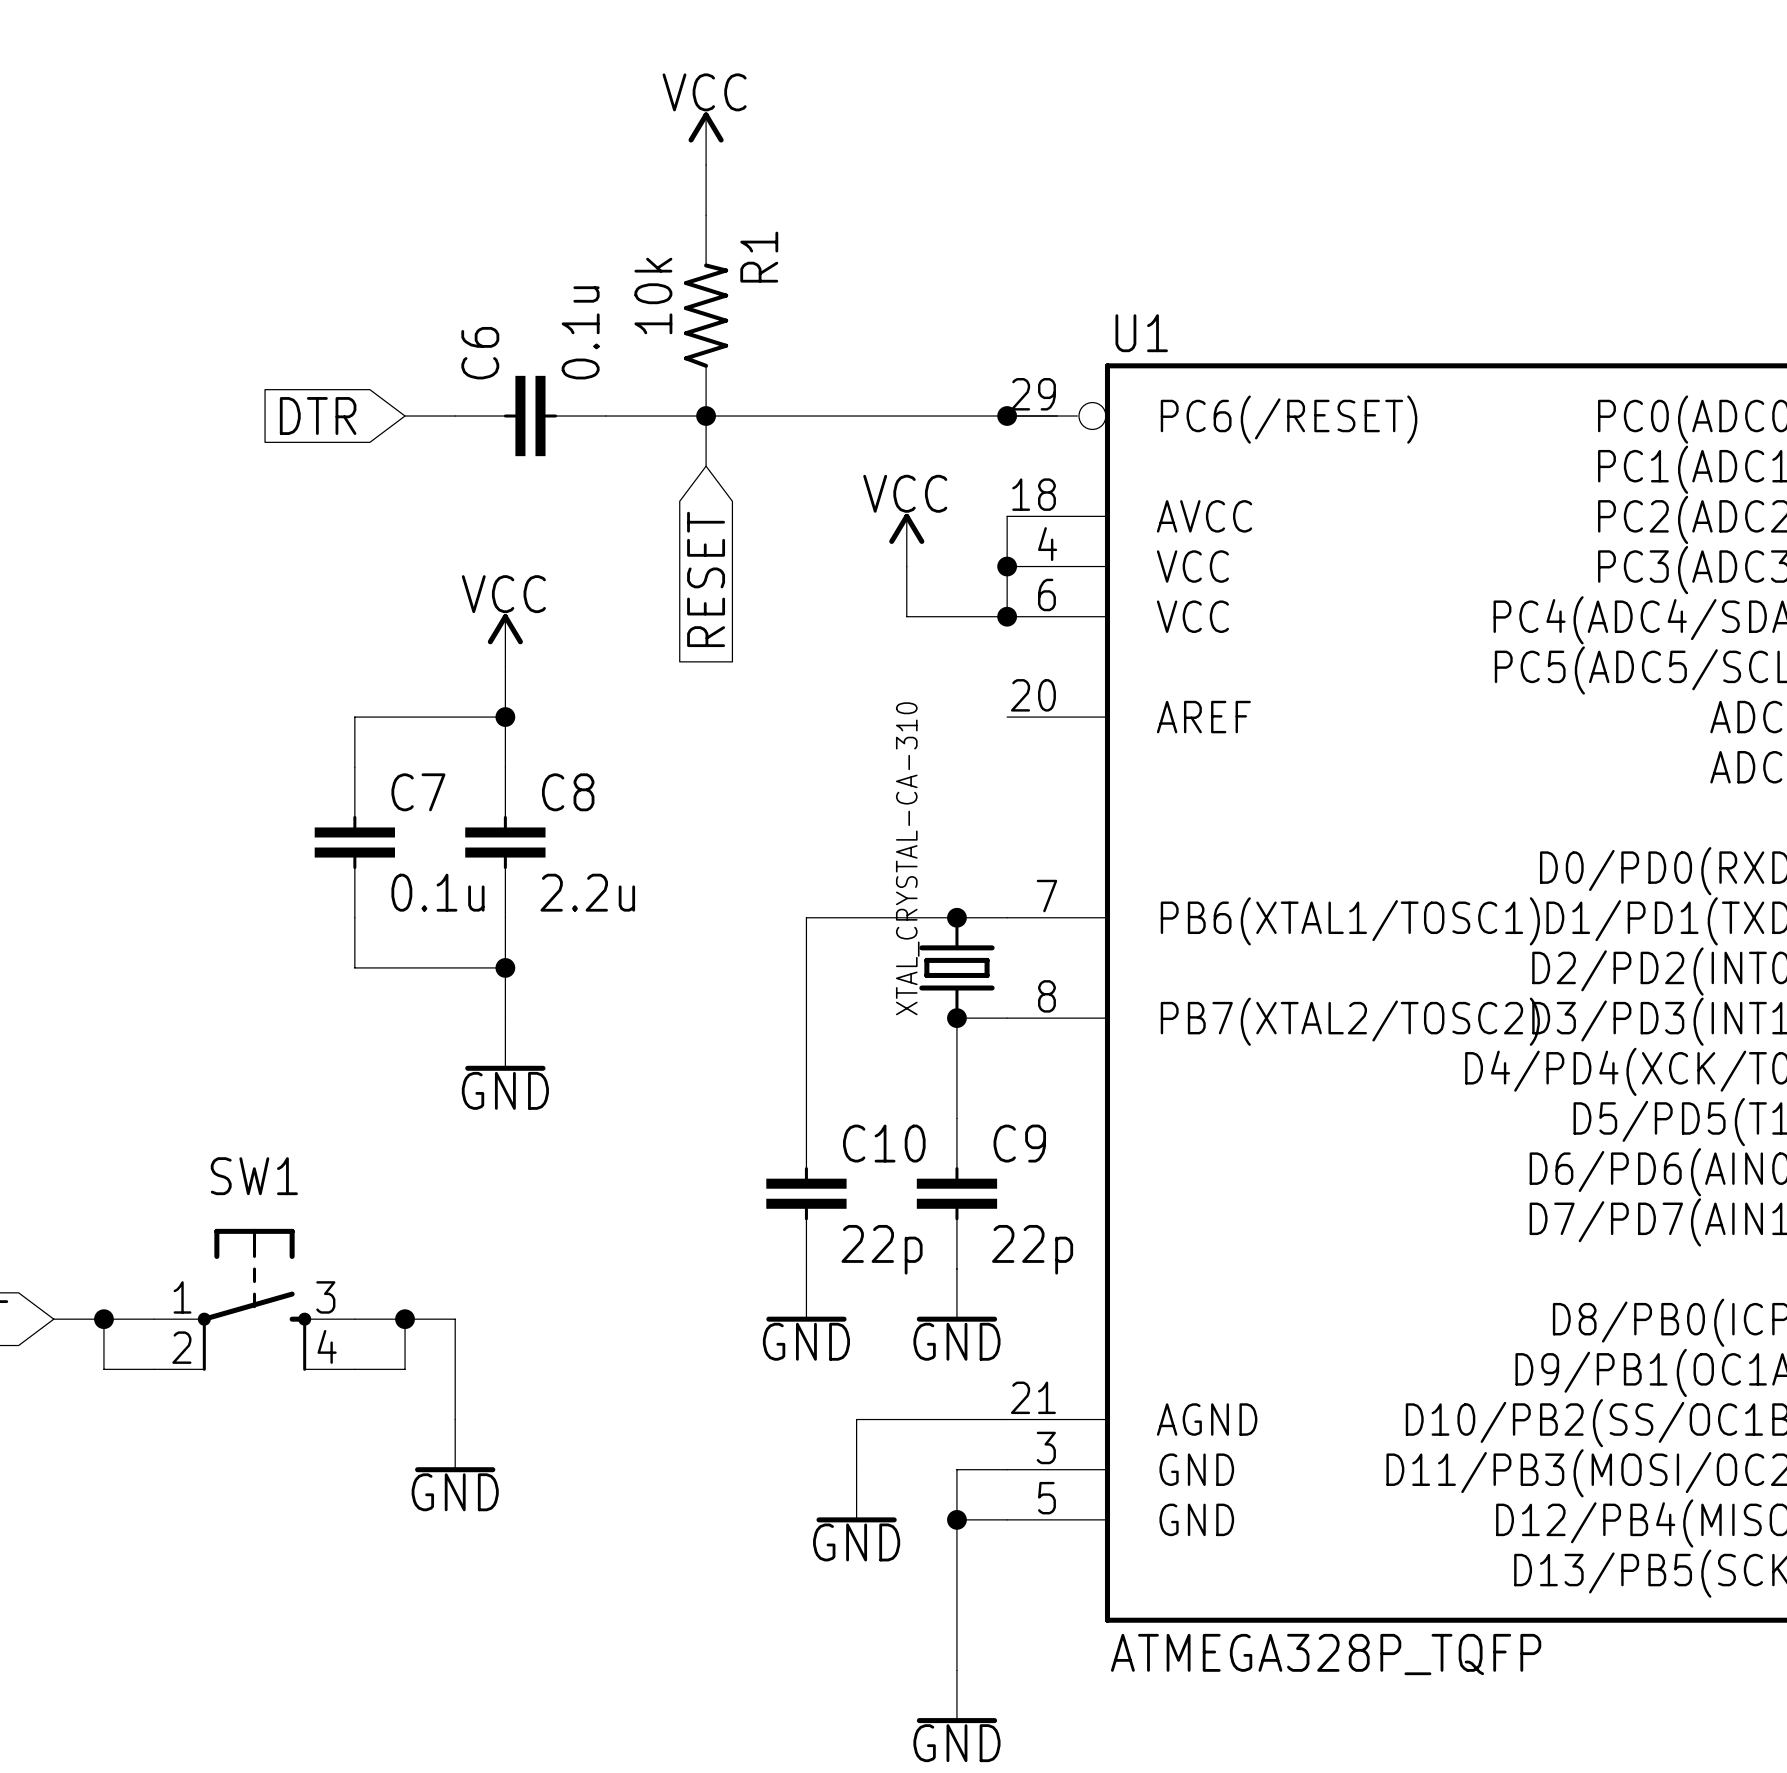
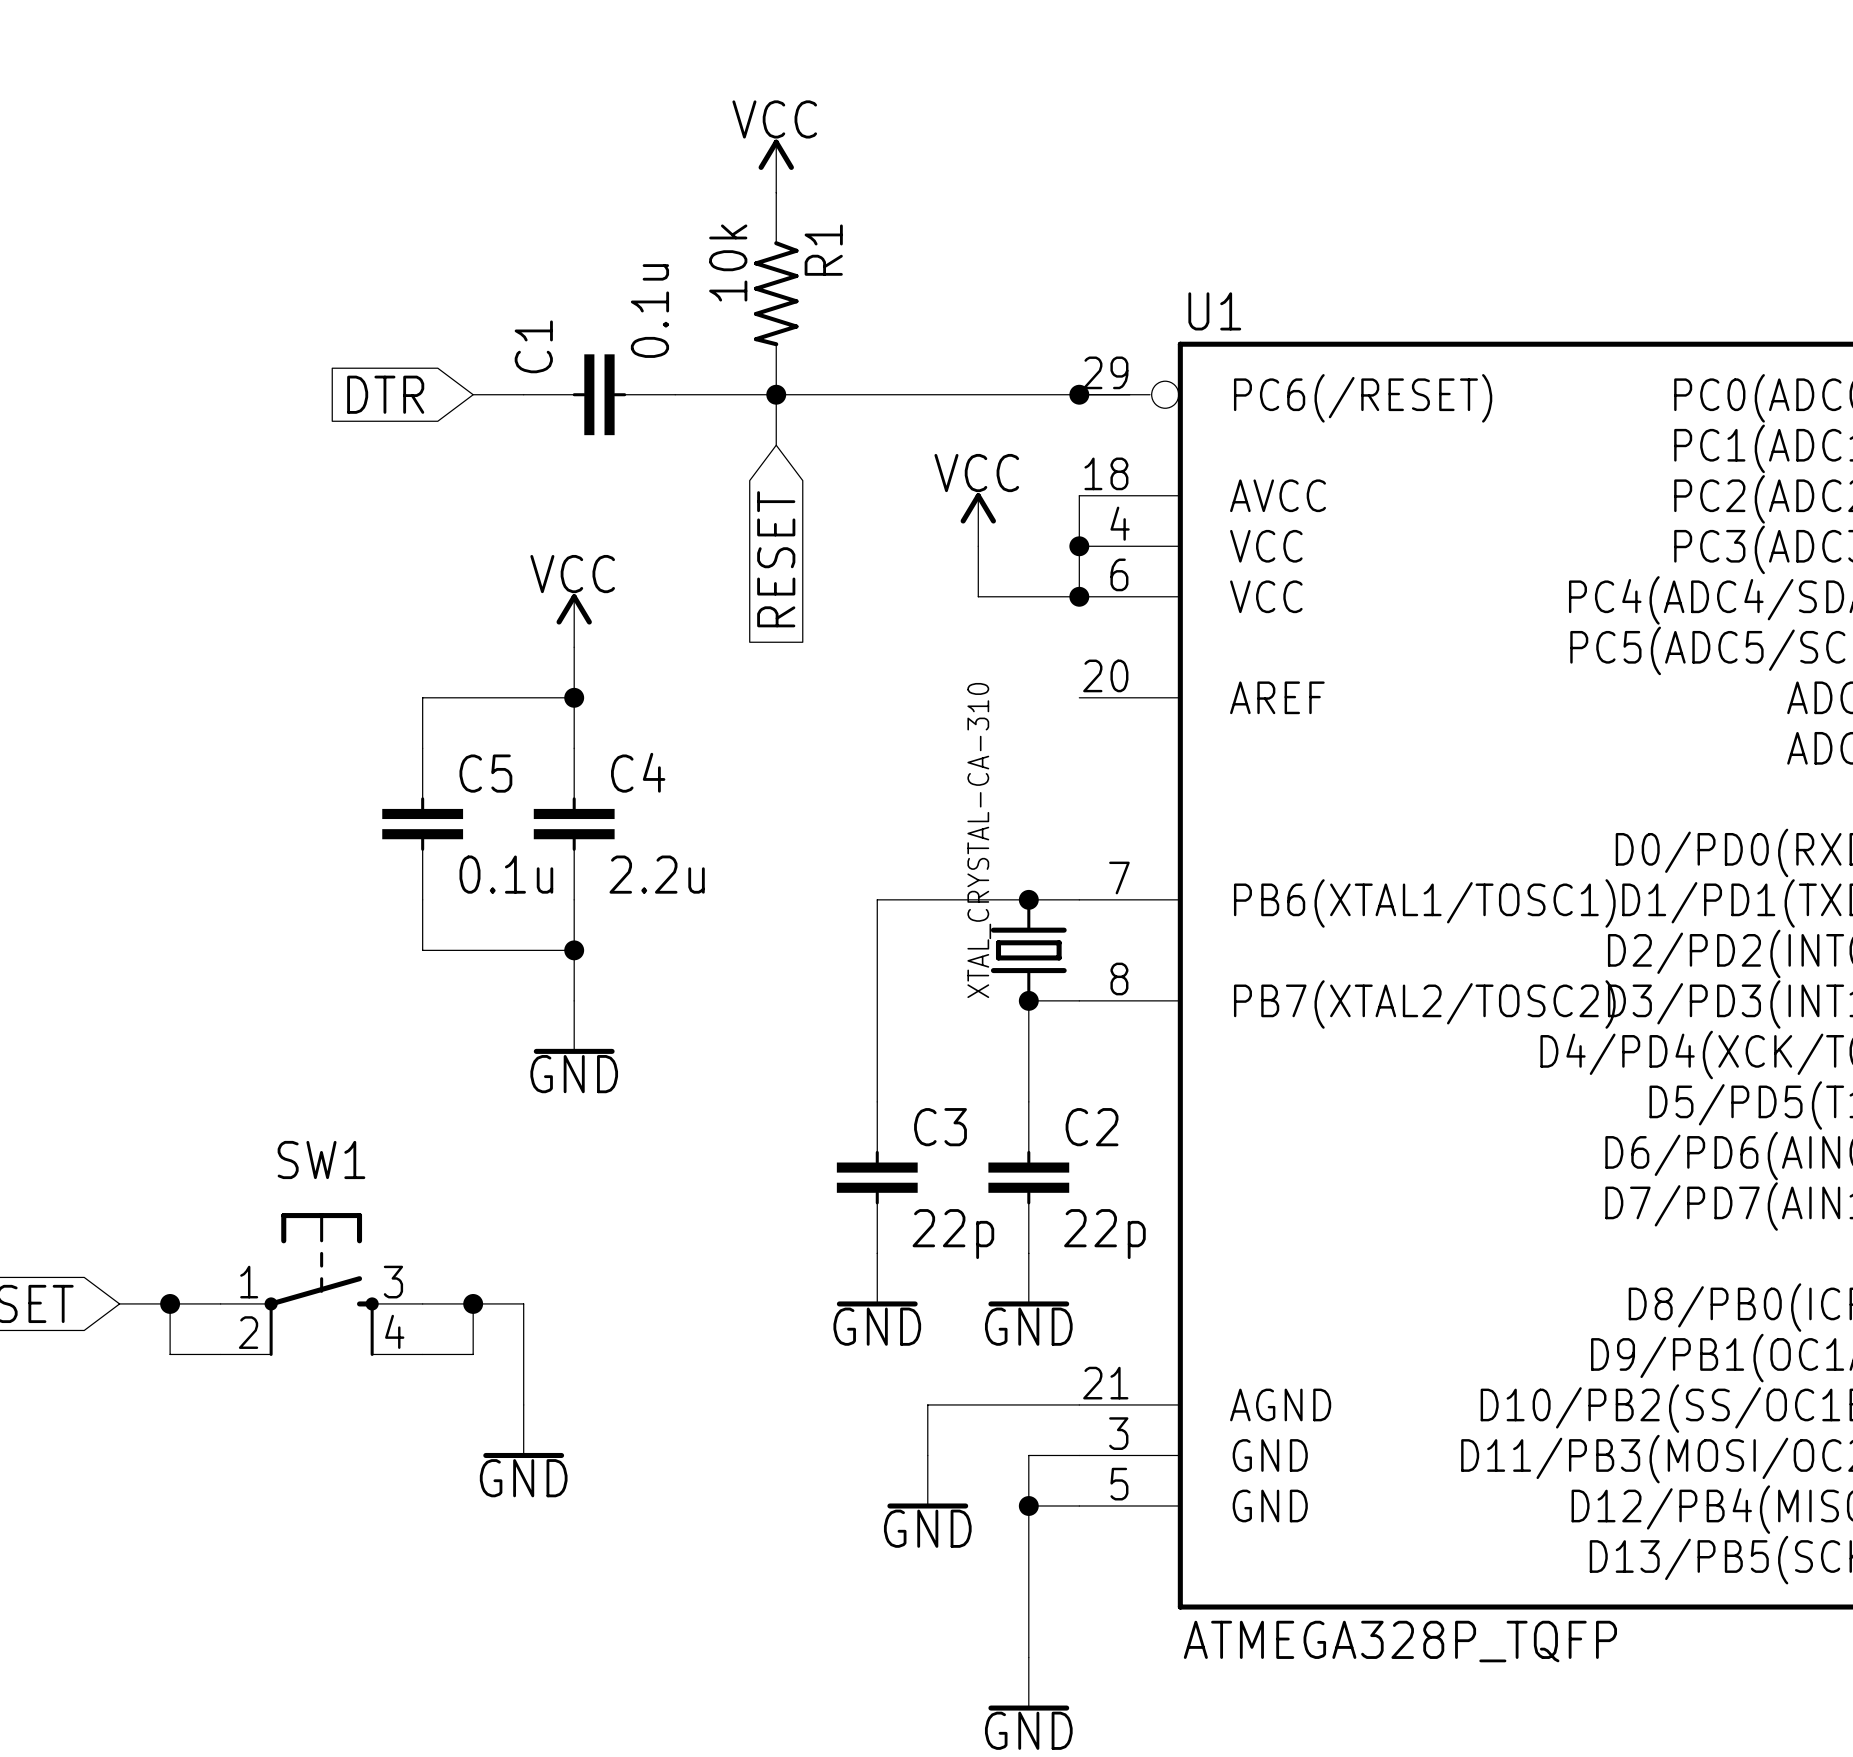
power symbol position: VCC (706, 138) -> VCC (776, 166)
R1 rotation: 0° (706, 315) -> 180° (776, 293)
C6 name: C6 (480, 353) -> C1 (533, 346)
C7 name: C7 (418, 792) -> C5 (485, 773)
C8 name: C8 (568, 792) -> C4 (638, 772)
C10 name: C10 (884, 1143) -> C3 (940, 1127)
C9 name: C9 (1019, 1143) -> C2 (1092, 1127)

